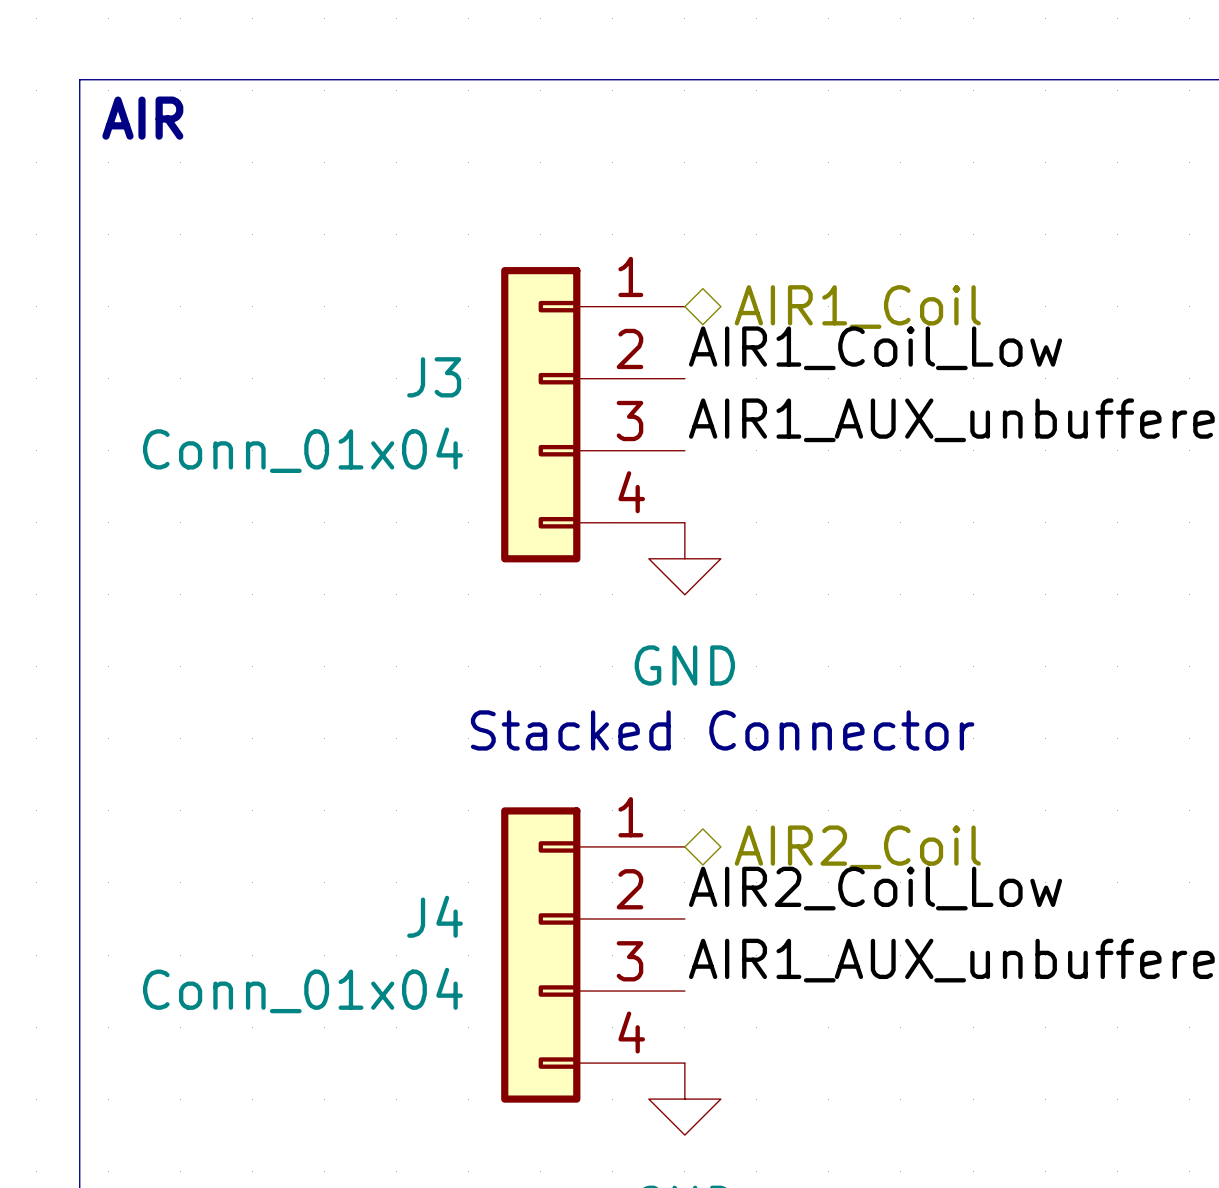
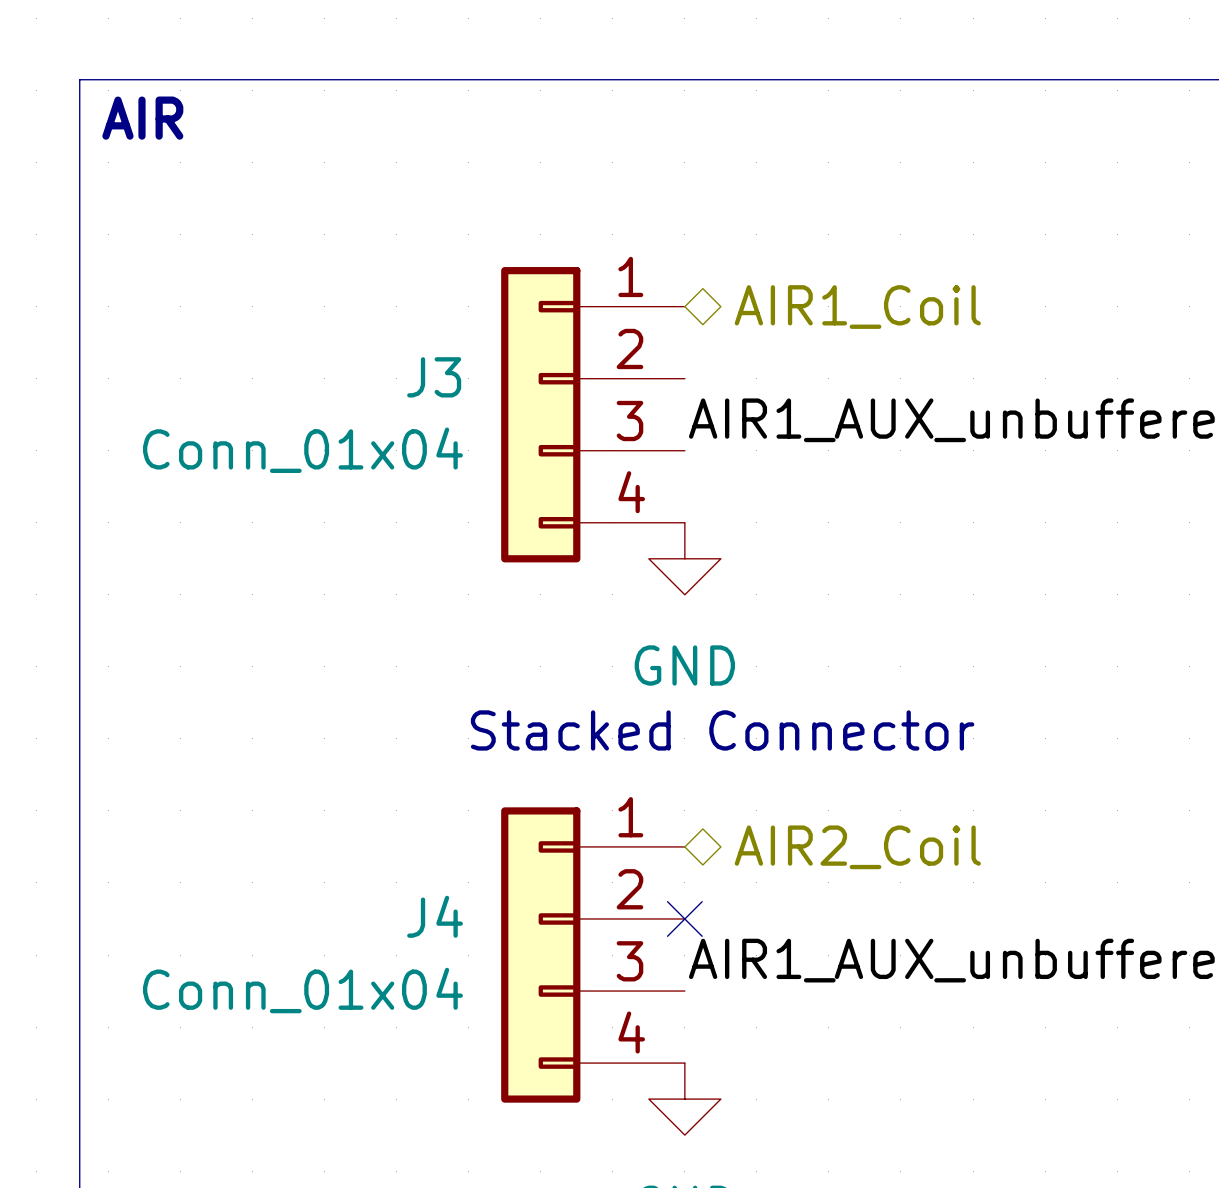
label: AIR1_Coil_Low (875, 348) -> none
label: AIR2_Coil_Low (875, 888) -> none
no-connect mark: none -> (684, 918)

